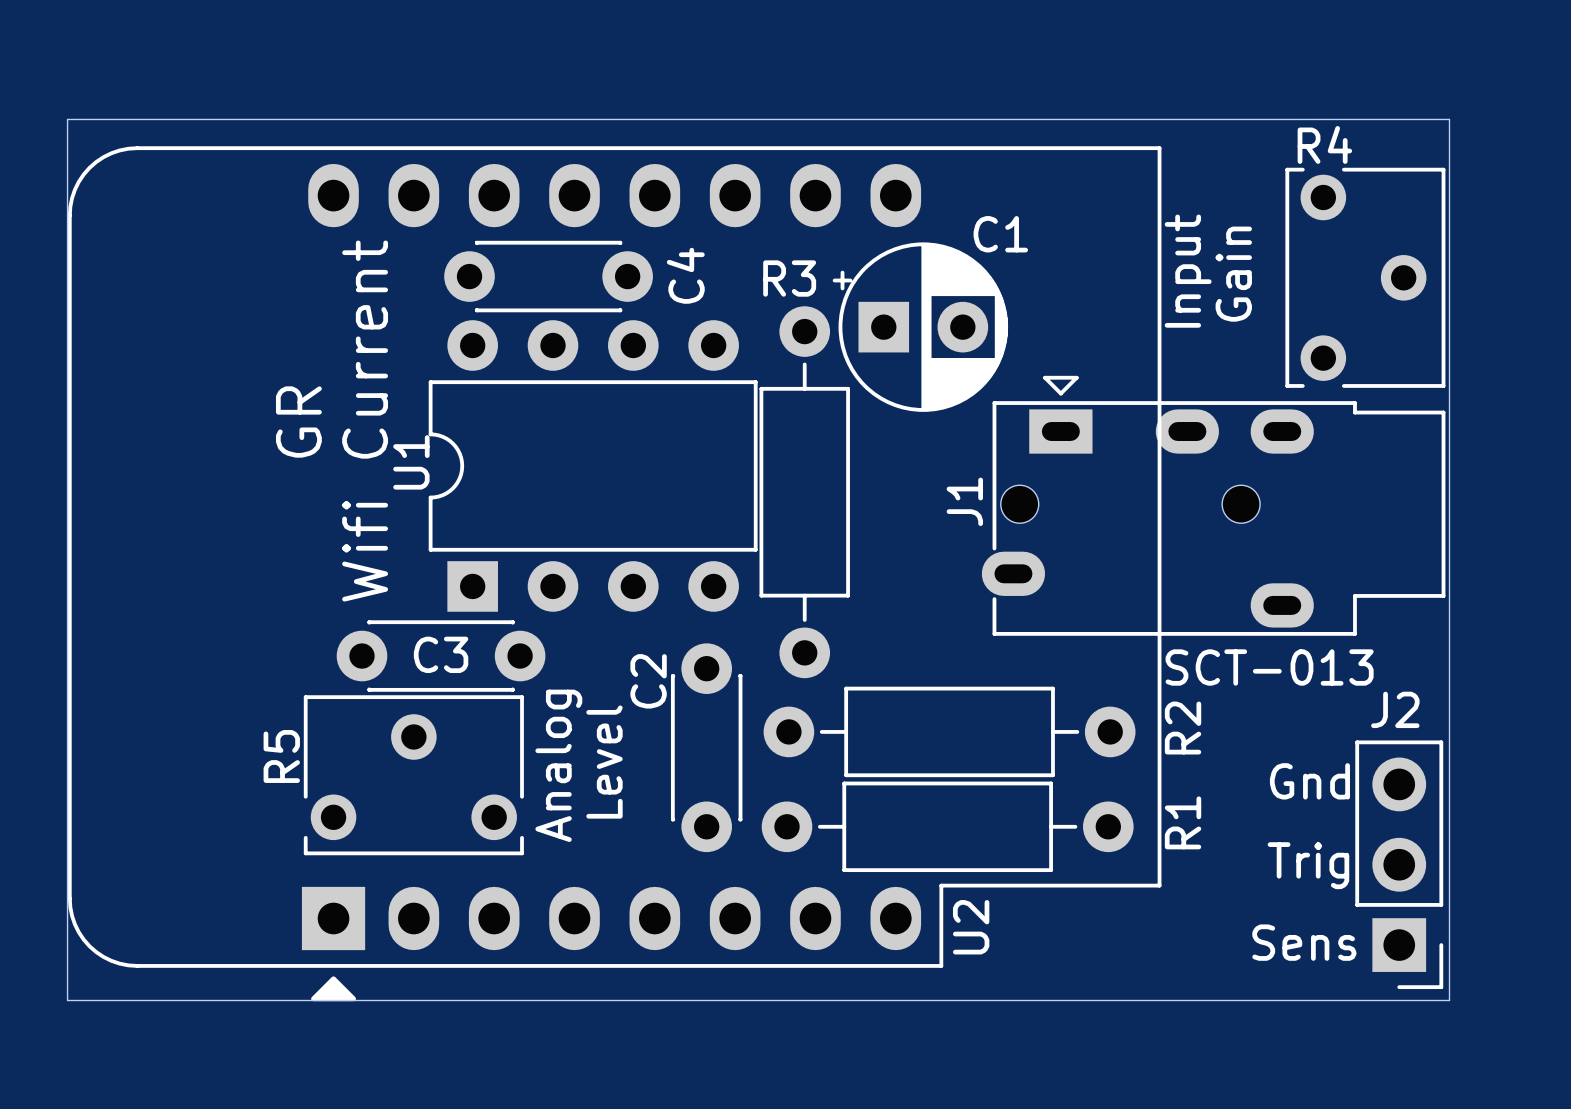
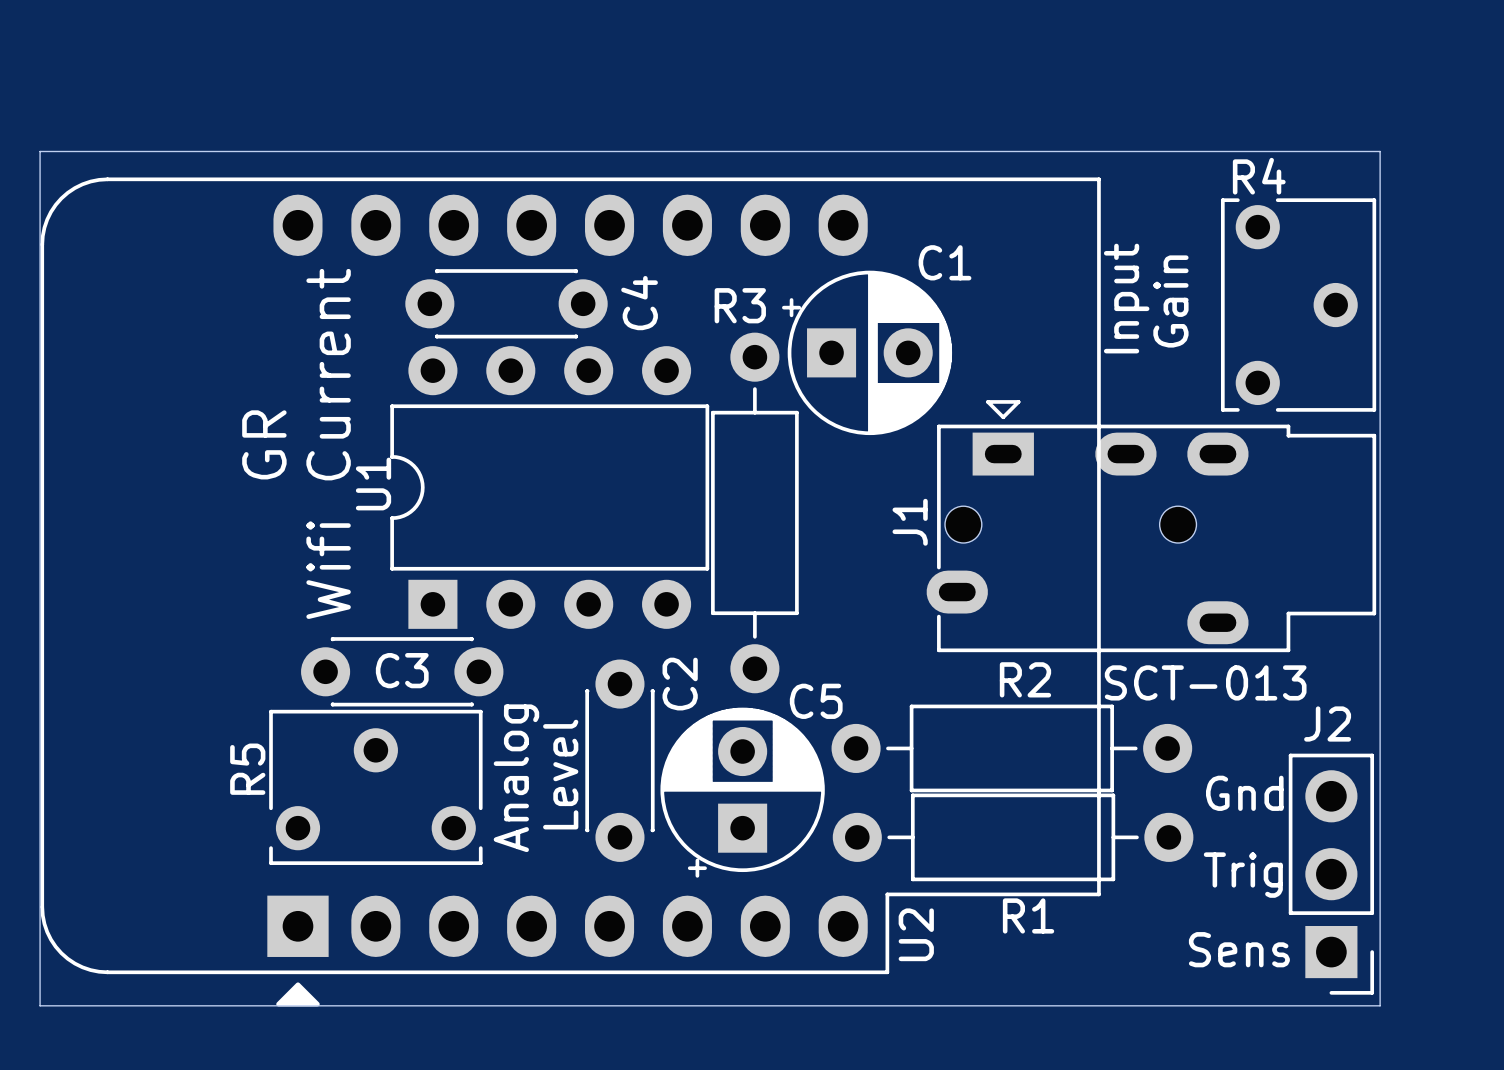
C2 name position: C2 (648, 681) -> C2 (680, 684)
R2 name rotation: 0° (1183, 728) -> 90° clockwise (1025, 679)
R2 name position: R2 (1183, 728) -> R2 (1025, 679)
R2 position: (949, 731) -> (1011, 748)
C2 position: (706, 747) -> (619, 760)
C5: none -> (742, 792)
R1 name rotation: 0° (1183, 822) -> 90° clockwise (1028, 915)
R1 name position: R1 (1183, 822) -> R1 (1028, 915)
R1 position: (947, 826) -> (1013, 837)

